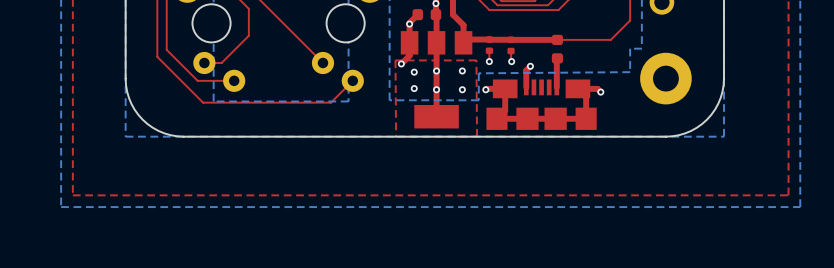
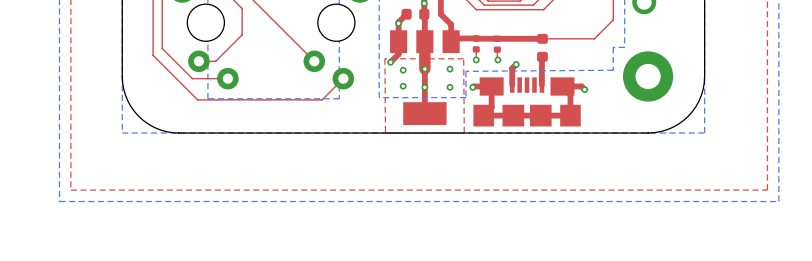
top track width: thin (436, 42) (436, 70) -> thick (424, 41) (424, 69)

